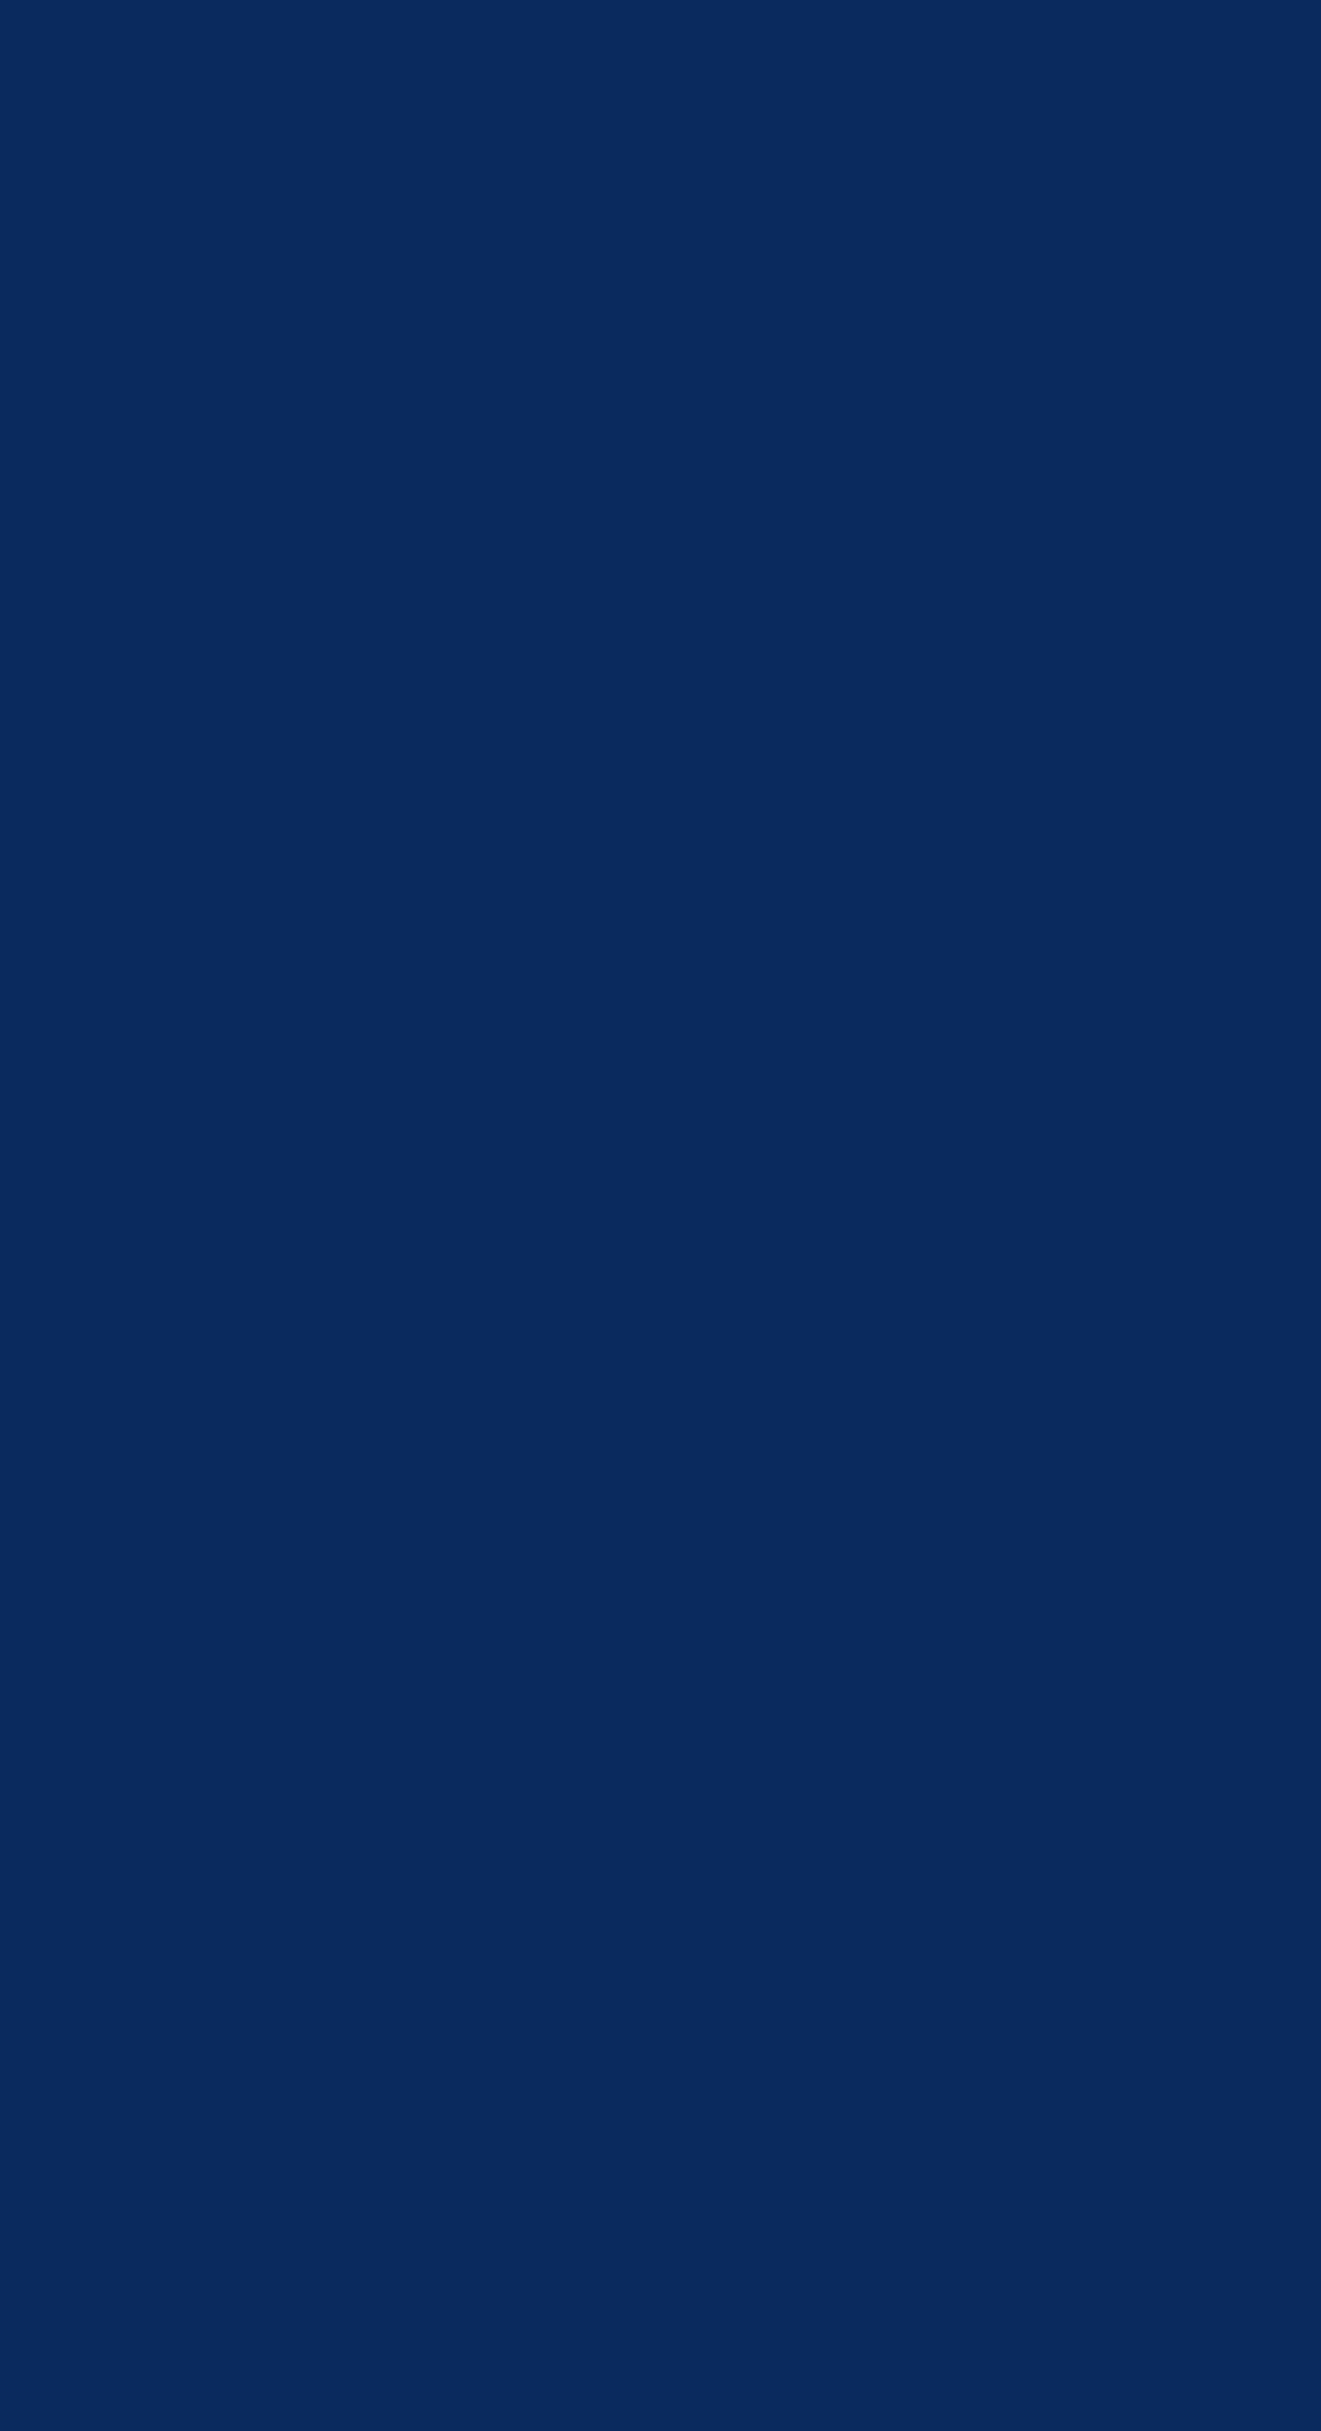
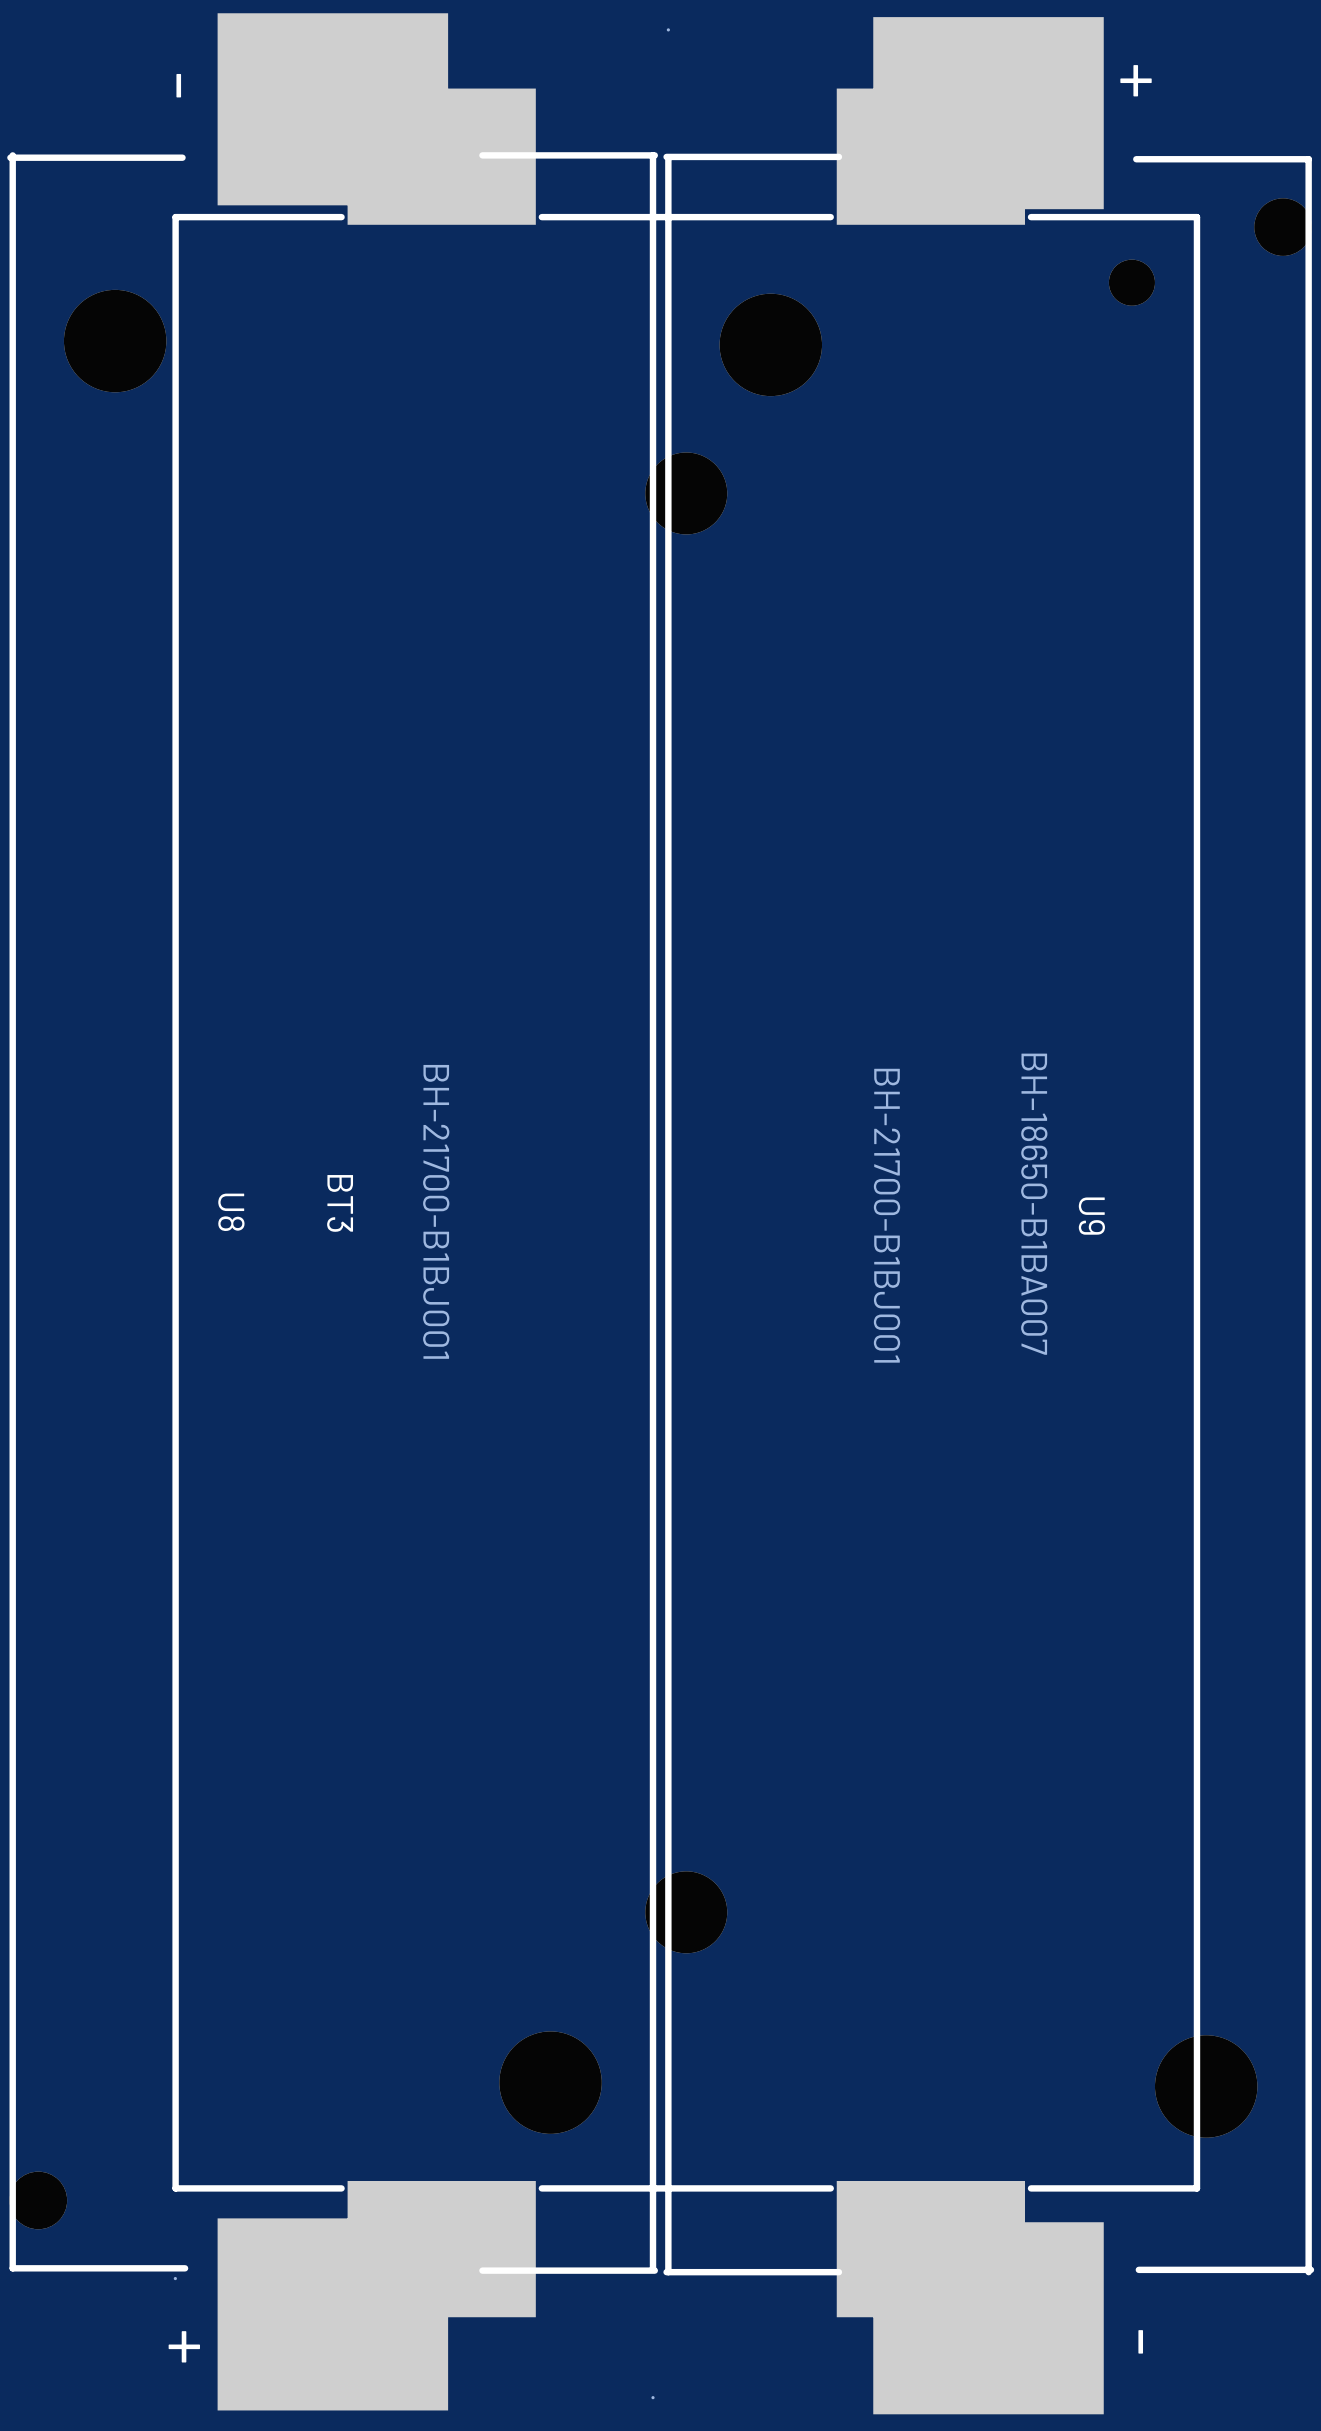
BT3: none -> BH-18650-B1BA007 (686, 1202)
U8: none -> BH-21700-B1BJ001 (332, 1211)
U9: none -> BH-21700-B1BJ001 (988, 1215)

